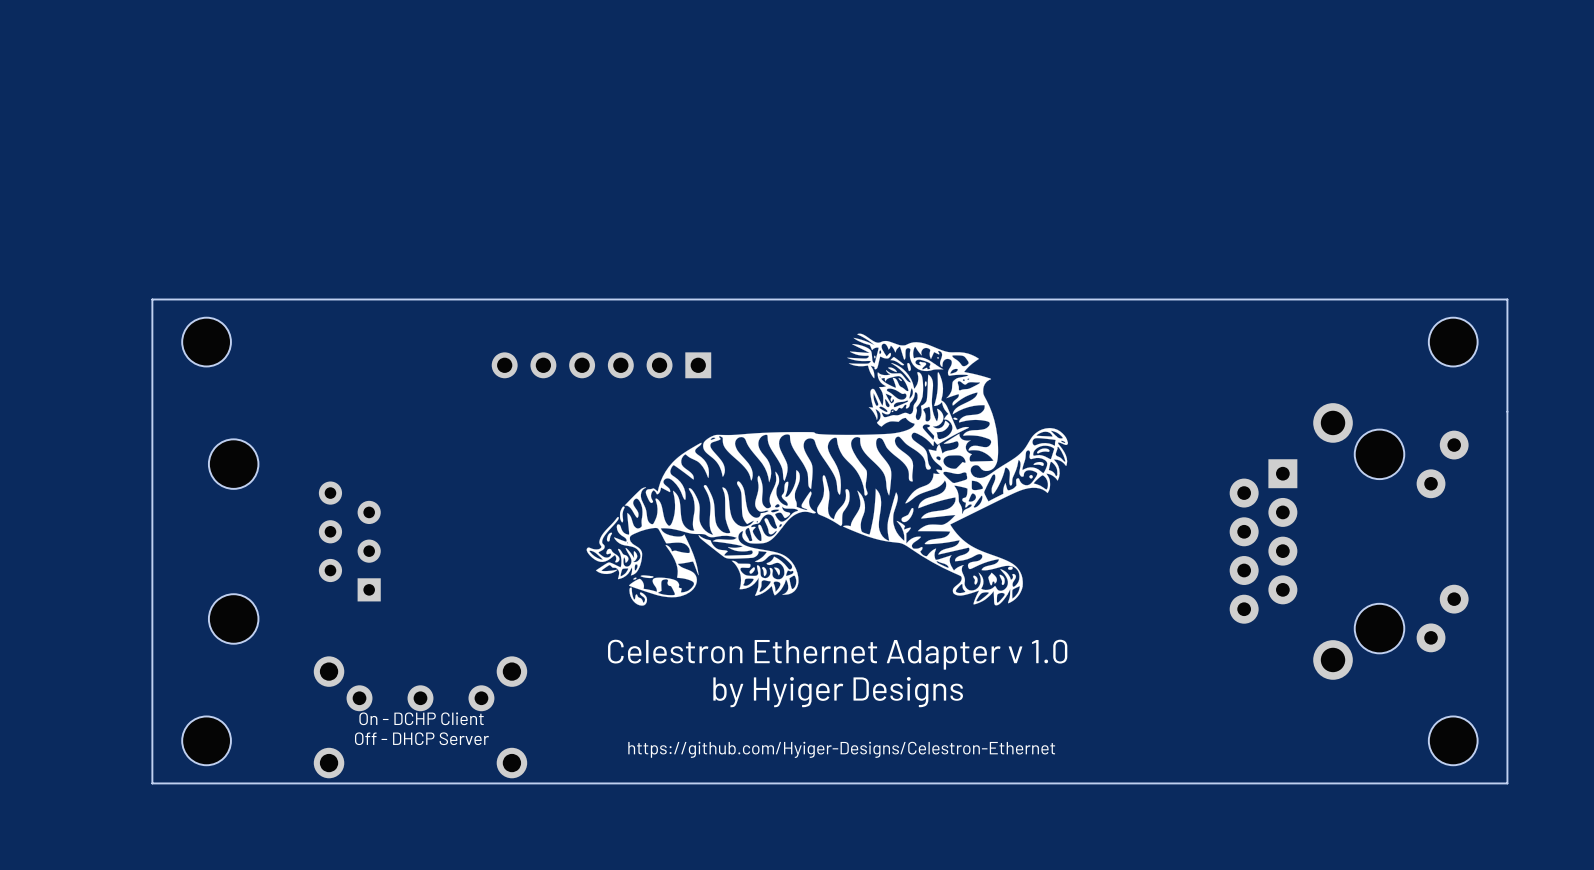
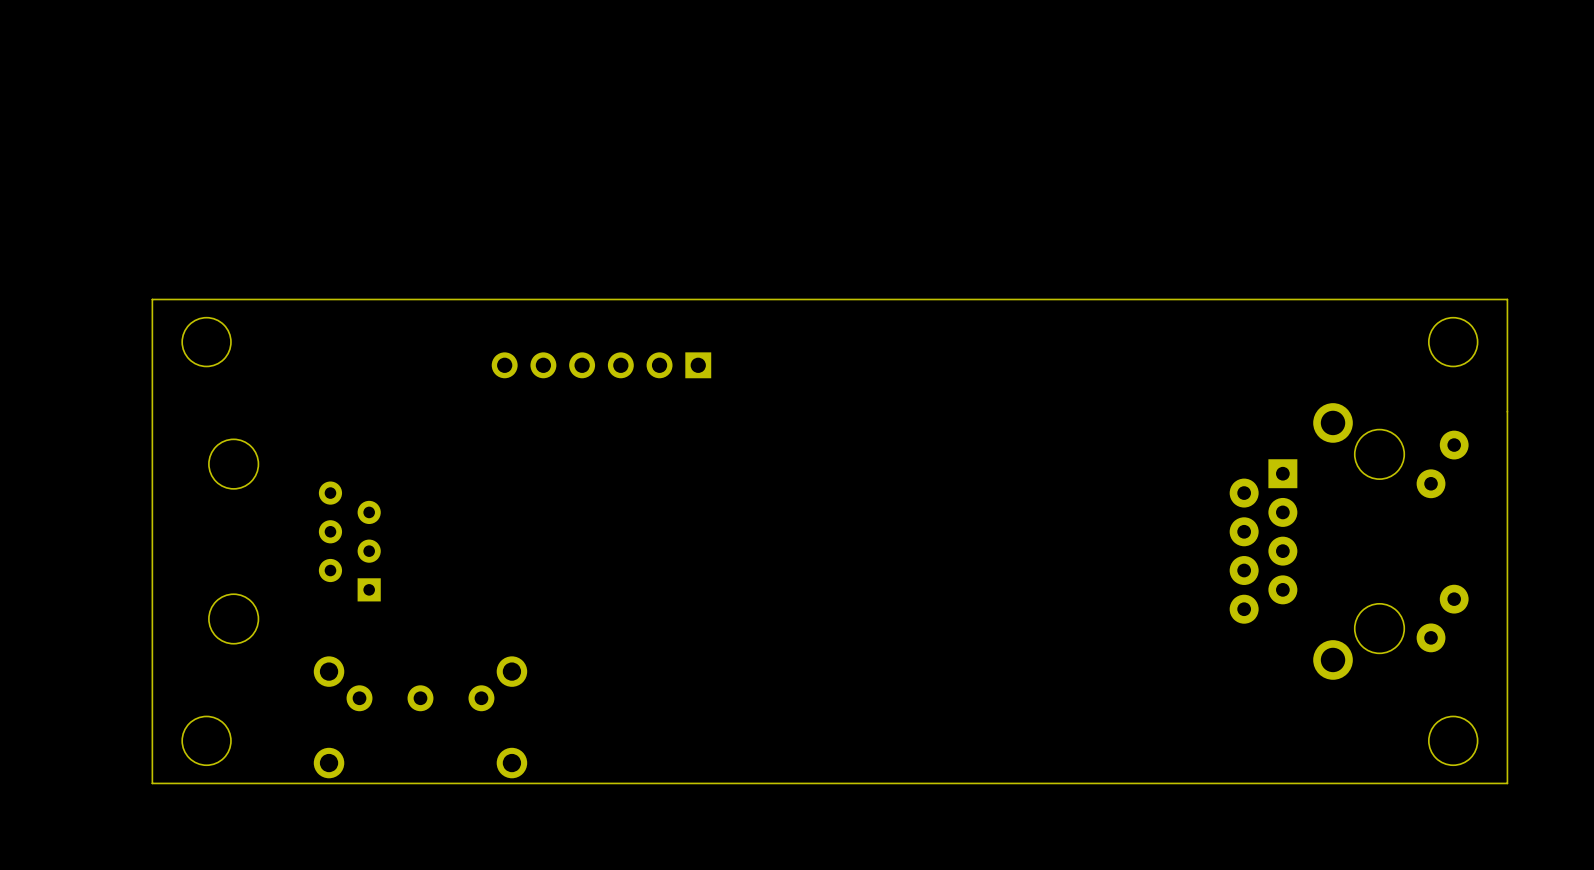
drawing: [586, 333, 1068, 606] -> none
text: Celestron Ethernet Adapter v 1.0 (837, 654) -> none
text: by Hyiger Designs (838, 692) -> none
text: On - DCHP Client (421, 718) -> none
text: Off - DHCP Server (421, 738) -> none
text: https://github.com/Hyiger-Designs/Celestron-Ethernet (841, 749) -> none

